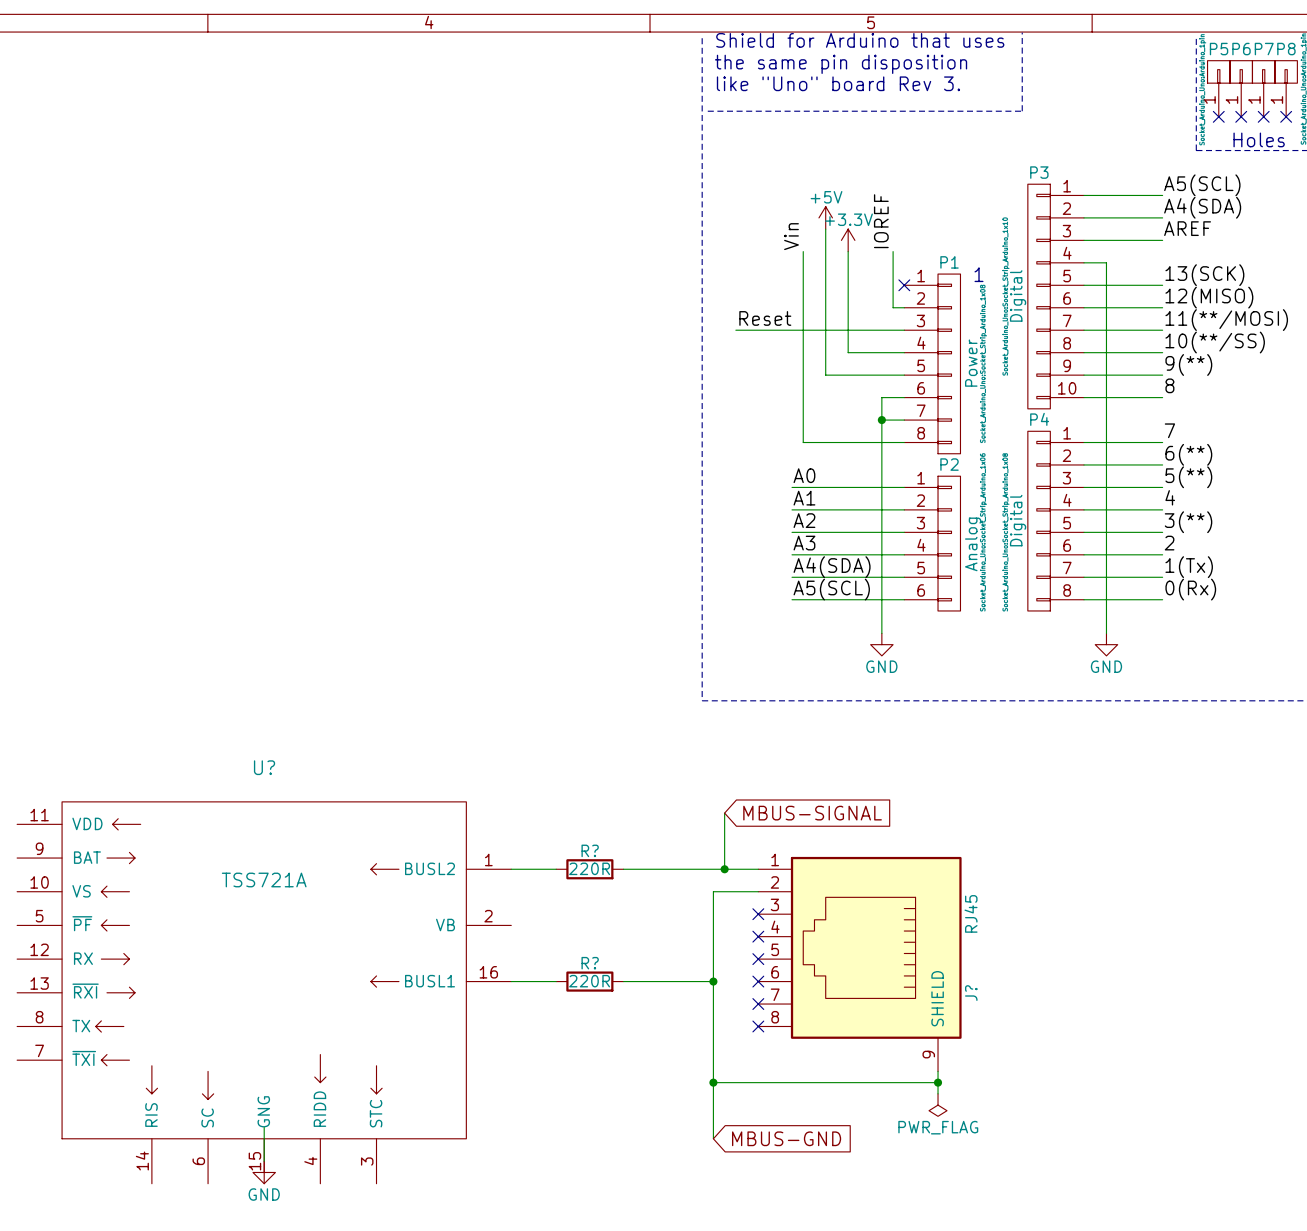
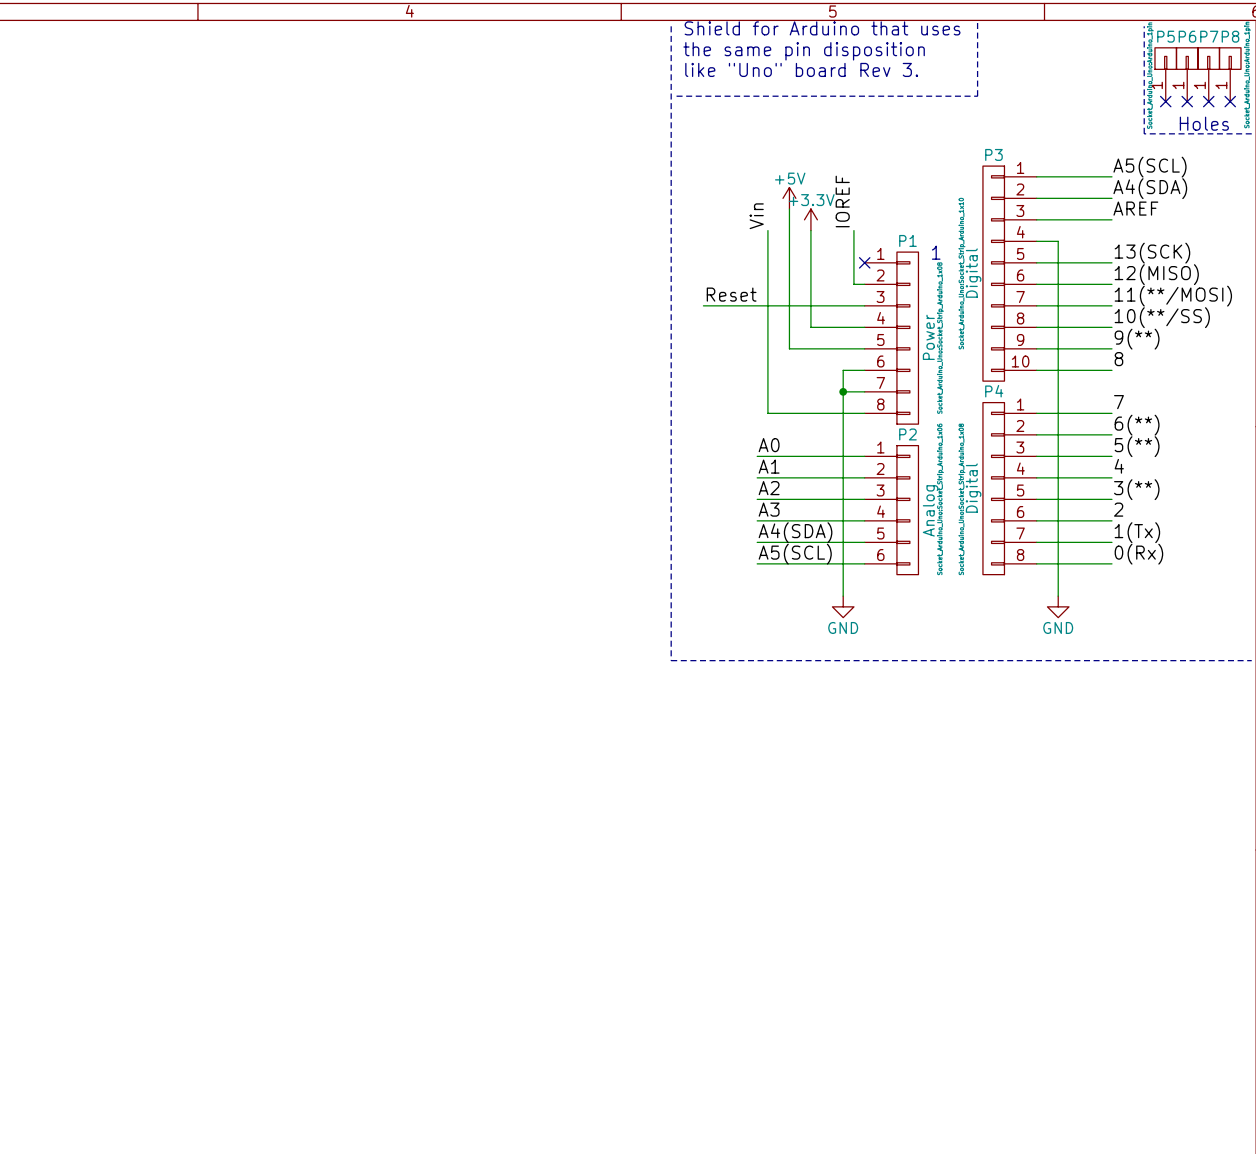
wire: (724, 813) (724, 869) -> none
global label: MBUS-SIGNAL (812, 813) -> none
wire: (511, 869) (556, 869) -> none
R?: 220R (589, 869) -> none
wire: (623, 869) (758, 869) -> none
junction: (724, 869) -> none
wire: (758, 891) (713, 891) (713, 1138) -> none
no-connect mark: (758, 914) -> none
no-connect mark: (758, 936) -> none
no-connect mark: (758, 959) -> none
J?: RJ45 (859, 964) -> none
wire: (511, 981) (556, 981) -> none
R?: 220R (589, 981) -> none
wire: (623, 981) (713, 981) -> none
junction: (713, 981) -> none
no-connect mark: (758, 981) -> none
U?: TSS721A (264, 992) -> none
no-connect mark: (758, 1004) -> none
no-connect mark: (758, 1026) -> none
wire: (938, 1071) (938, 1093) -> none
wire: (713, 1082) (938, 1082) -> none
junction: (713, 1082) -> none
junction: (938, 1082) -> none
power symbol: PWR_FLAG (938, 1105) -> none
wire: (264, 1127) (264, 1161) -> none
global label: MBUS-GND (786, 1138) -> none
power symbol: GND (264, 1172) -> none

